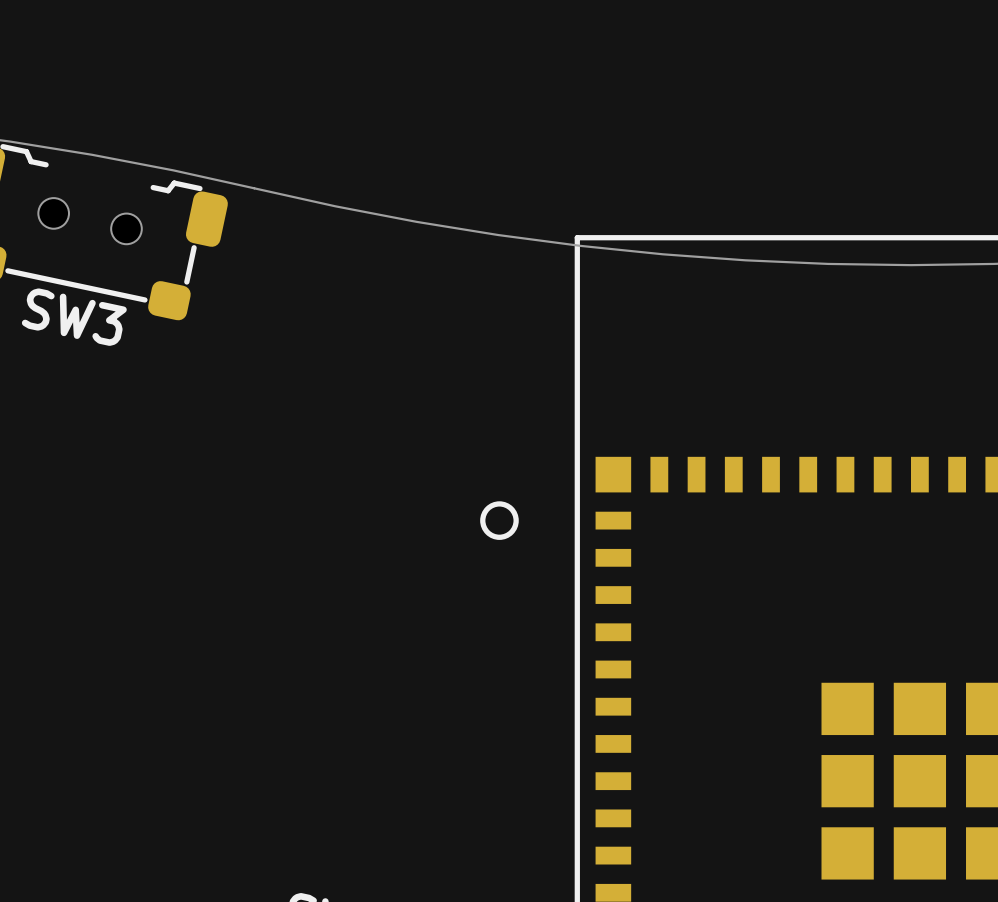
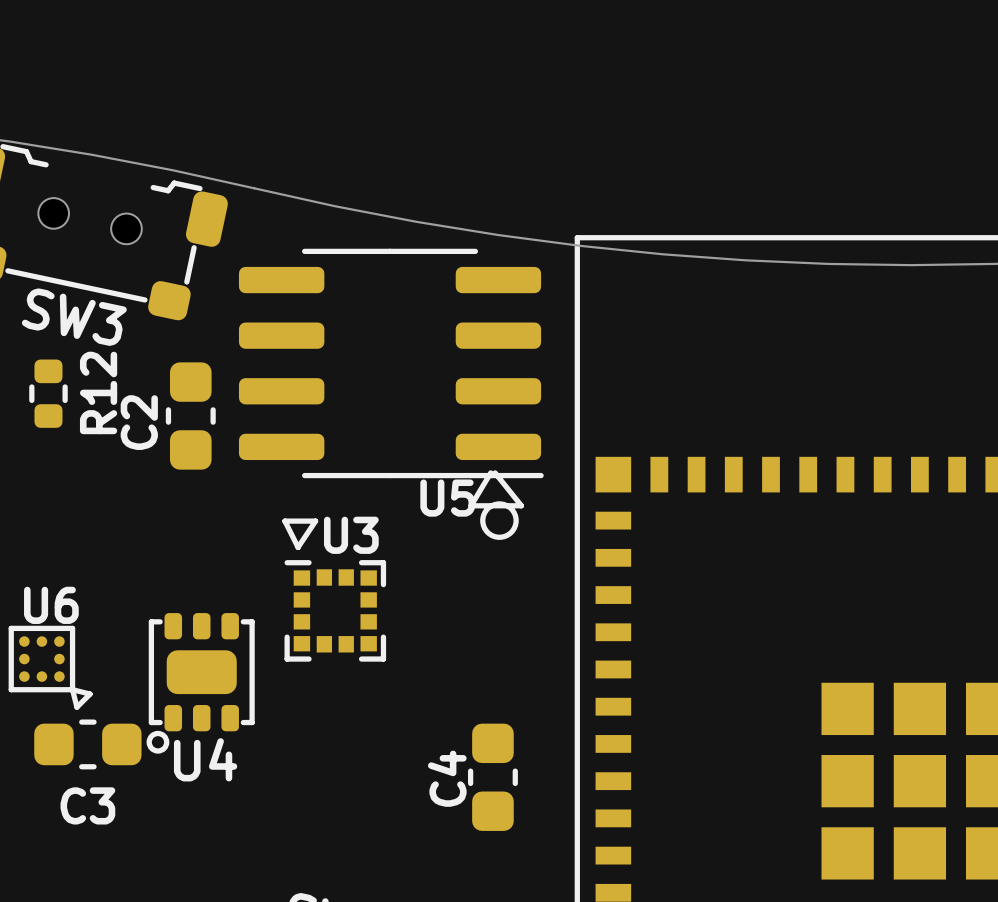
U5: none -> (391, 363)
R12: none -> (48, 393)
C2: none -> (190, 416)
line: none -> (490, 472) (471, 505) (521, 505) (495, 472)
line: none -> (284, 521) (298, 547) (315, 521) (284, 521)
U3: none -> (335, 610)
U6: none -> (50, 667)
U4: none -> (200, 683)
C3: none -> (87, 744)
C4: none -> (492, 777)

